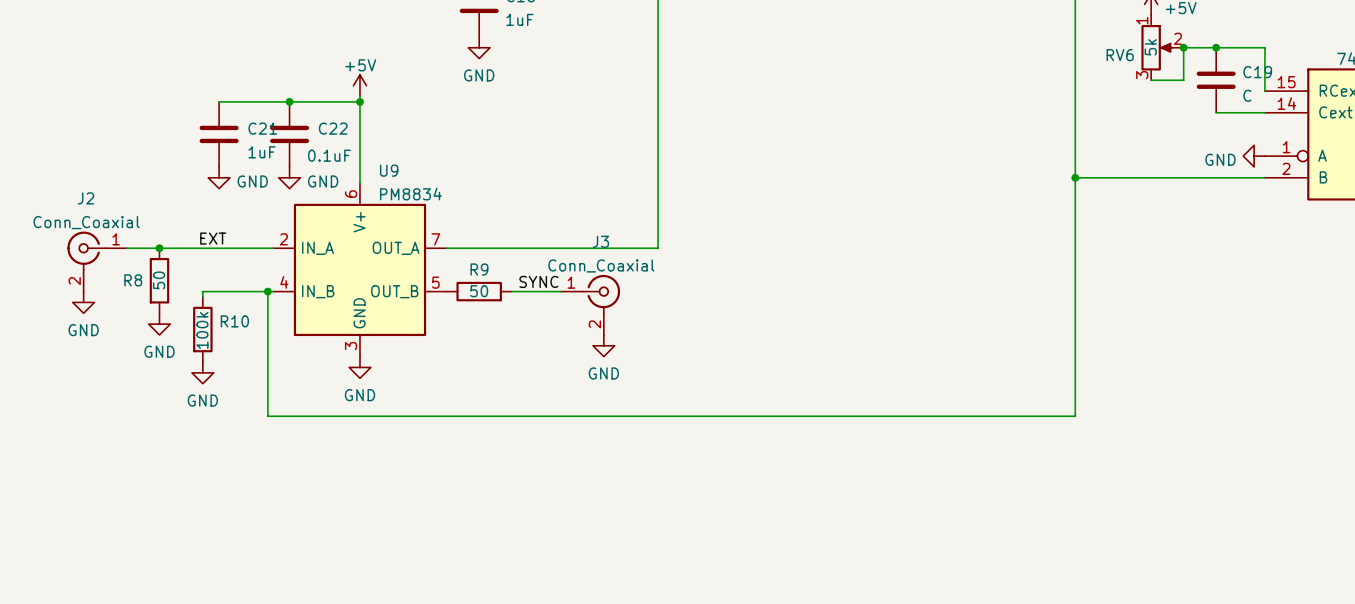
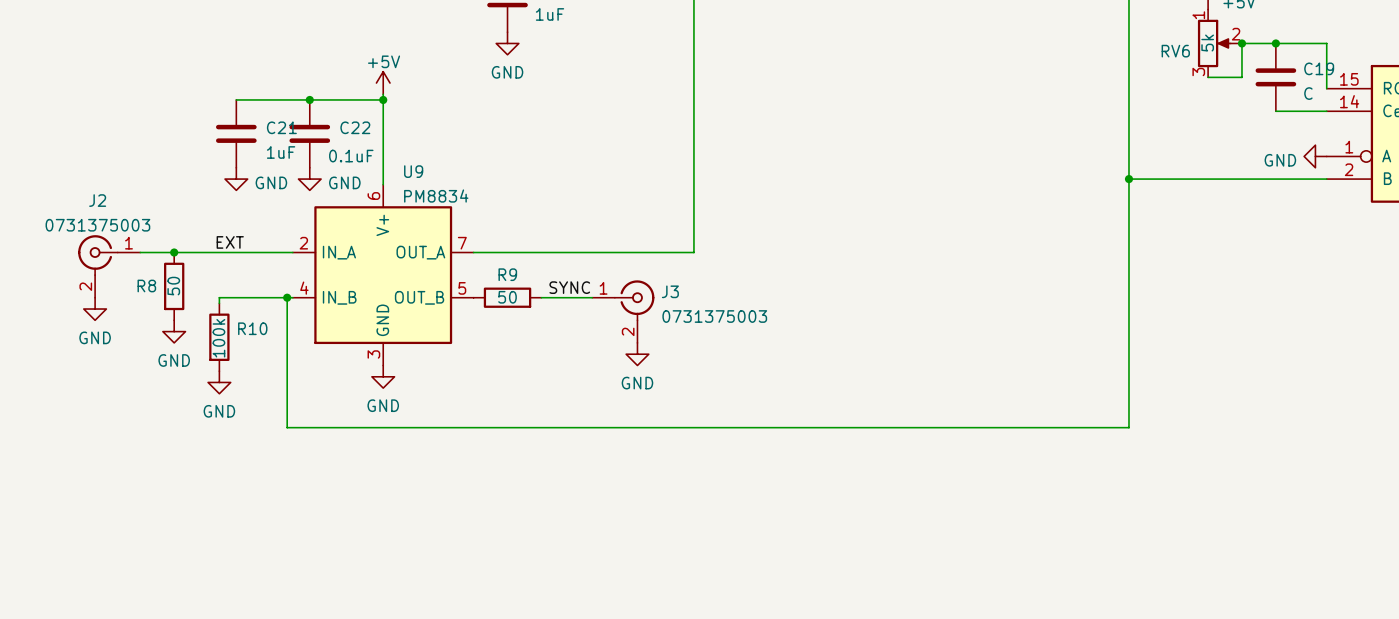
J2 value: Conn_Coaxial (86, 222) -> 0731375003 (97, 225)
J3 name position: J3 (600, 241) -> J3 (670, 291)
J3 value: Conn_Coaxial (601, 265) -> 0731375003 (714, 316)

